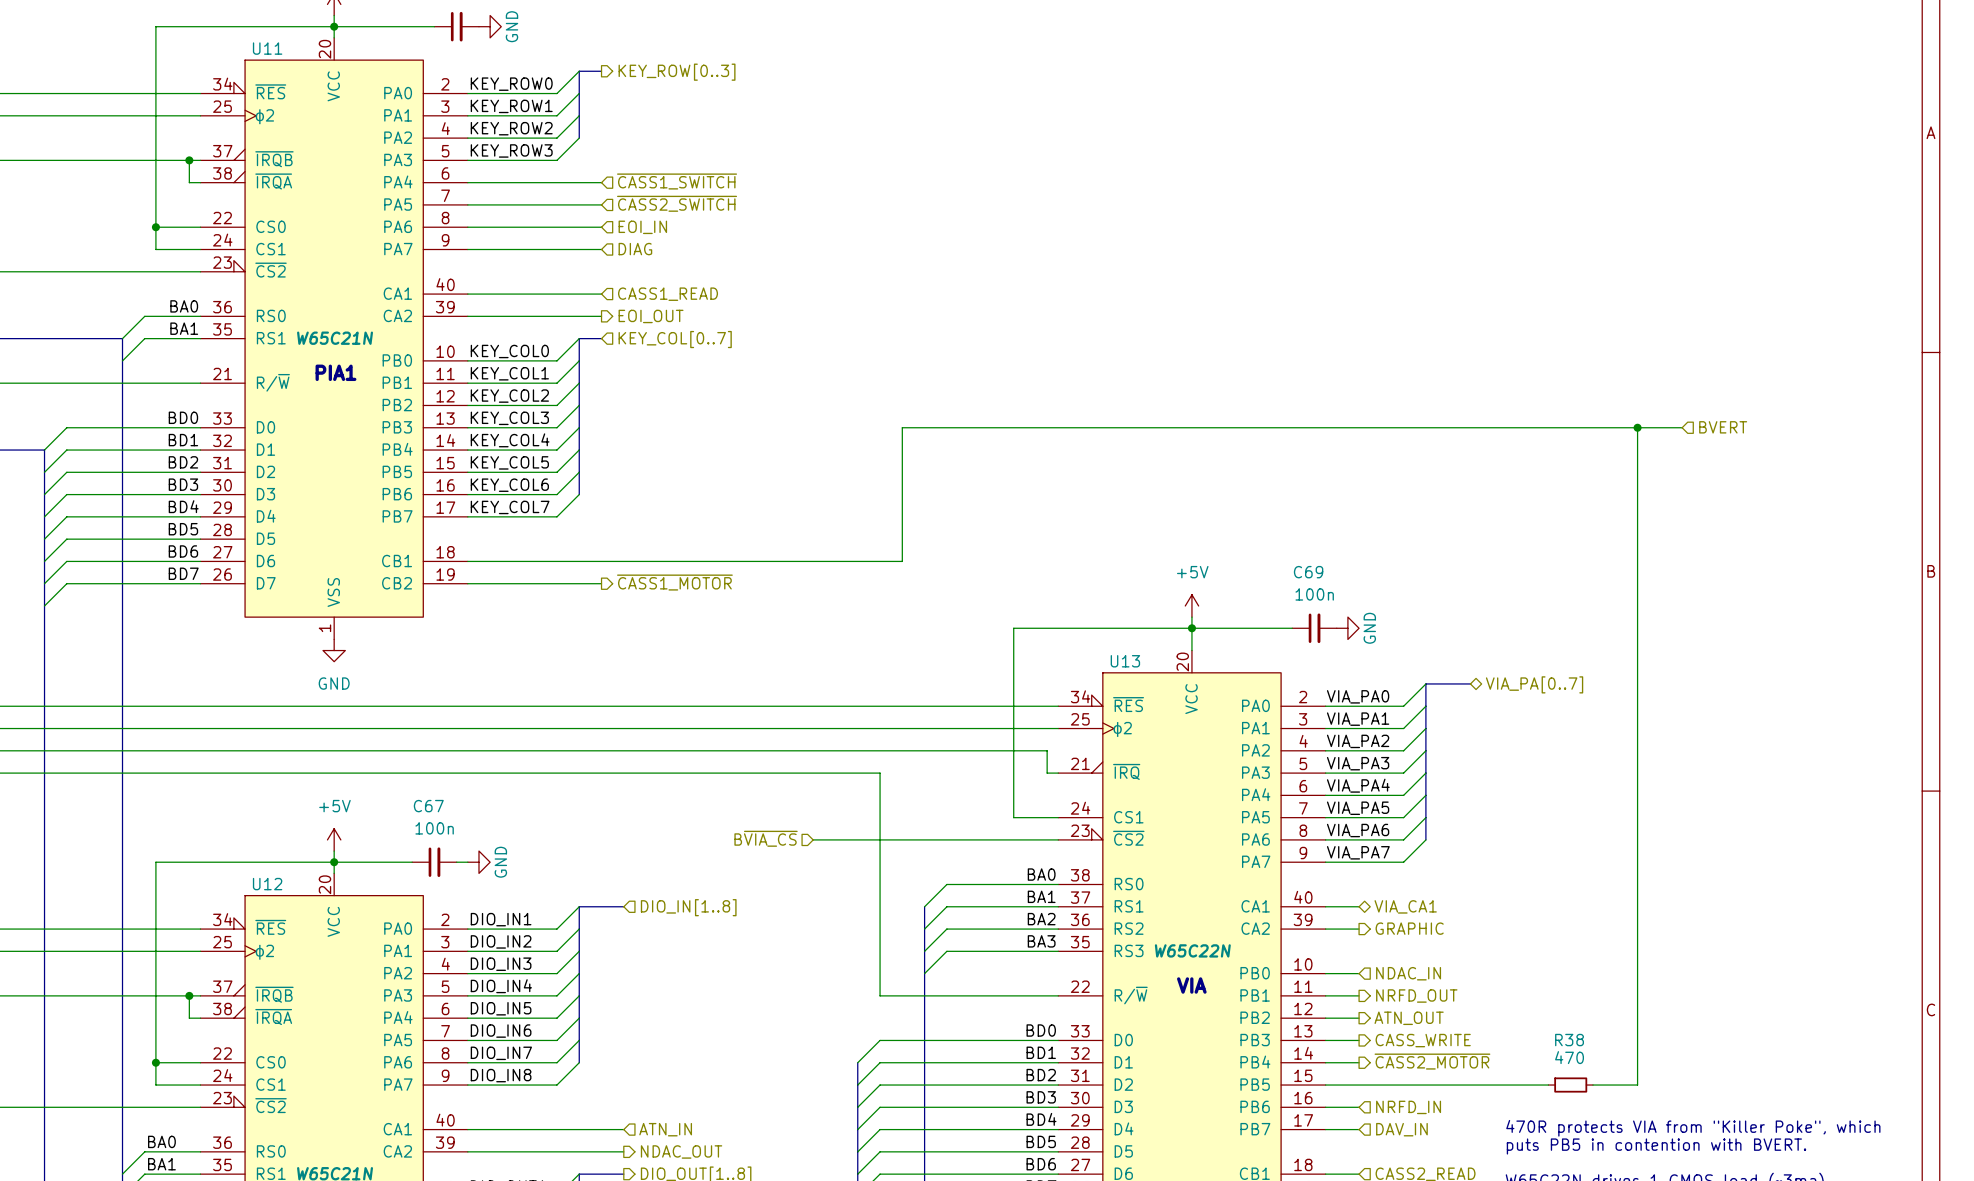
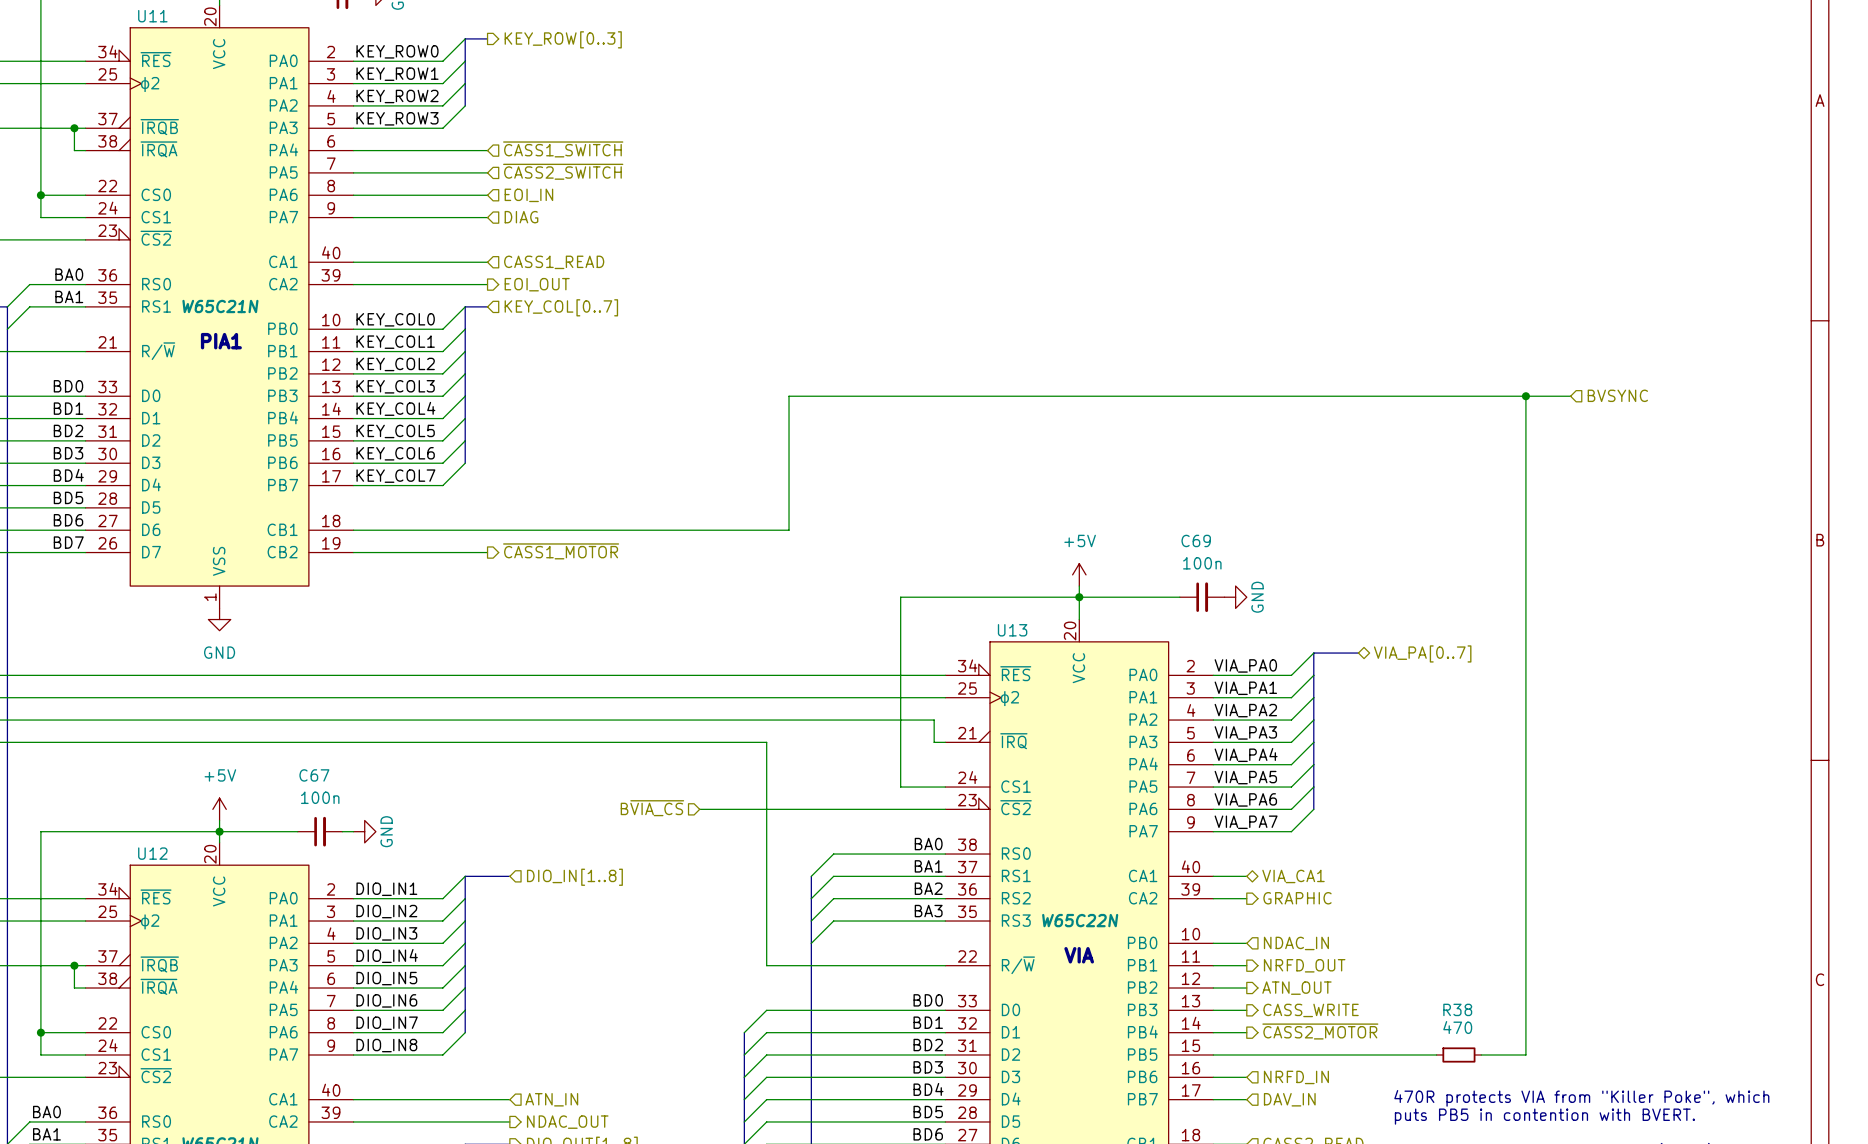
hierarchical label: BVERT (1723, 427) -> BVSYNC (1617, 395)

